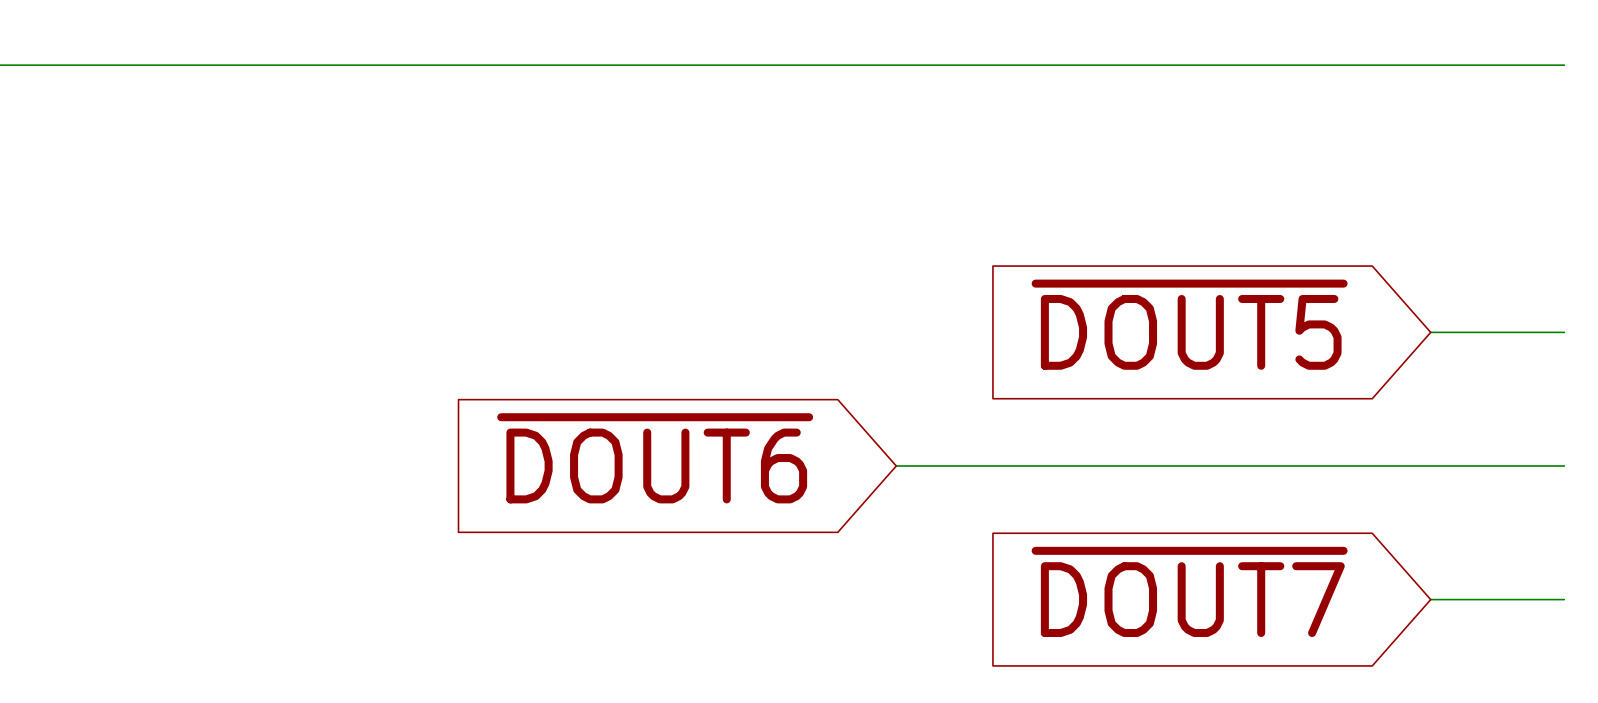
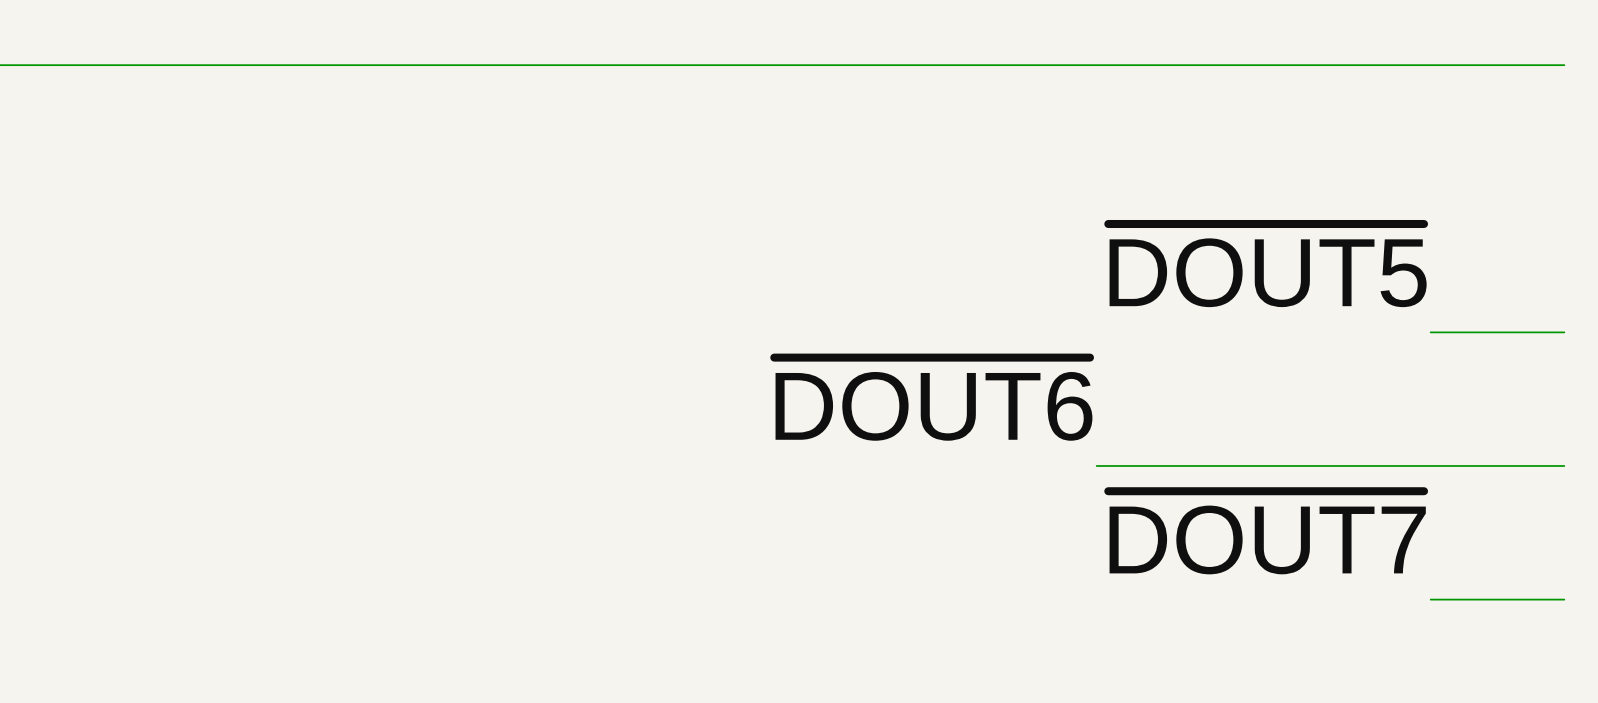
label: none -> ~{DOUT5} (1267, 265)
global label: ~{DOUT5} (1189, 324) -> none
label: none -> ~{DOUT6} (933, 399)
global label: ~{DOUT6} (655, 458) -> none
wire: (896, 465) (1096, 465) -> none
label: none -> ~{DOUT7} (1267, 532)
global label: ~{DOUT7} (1189, 591) -> none

